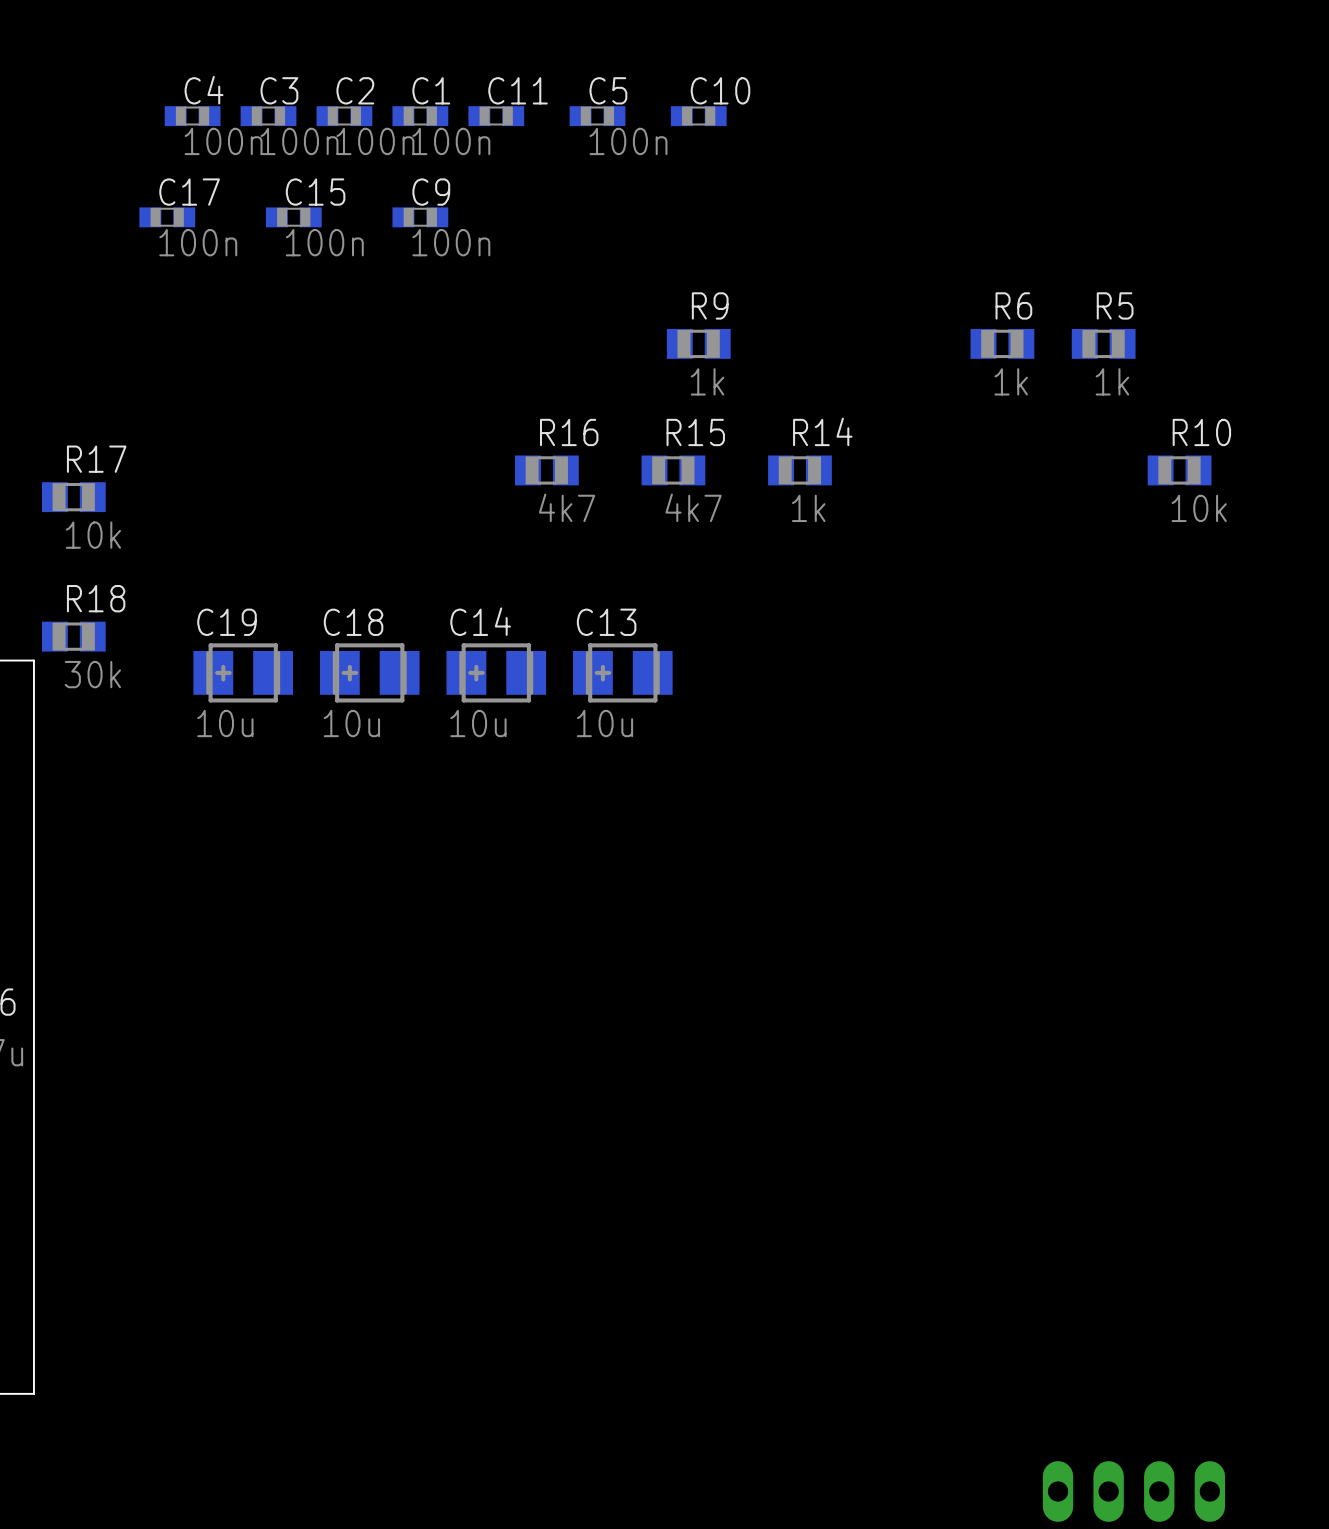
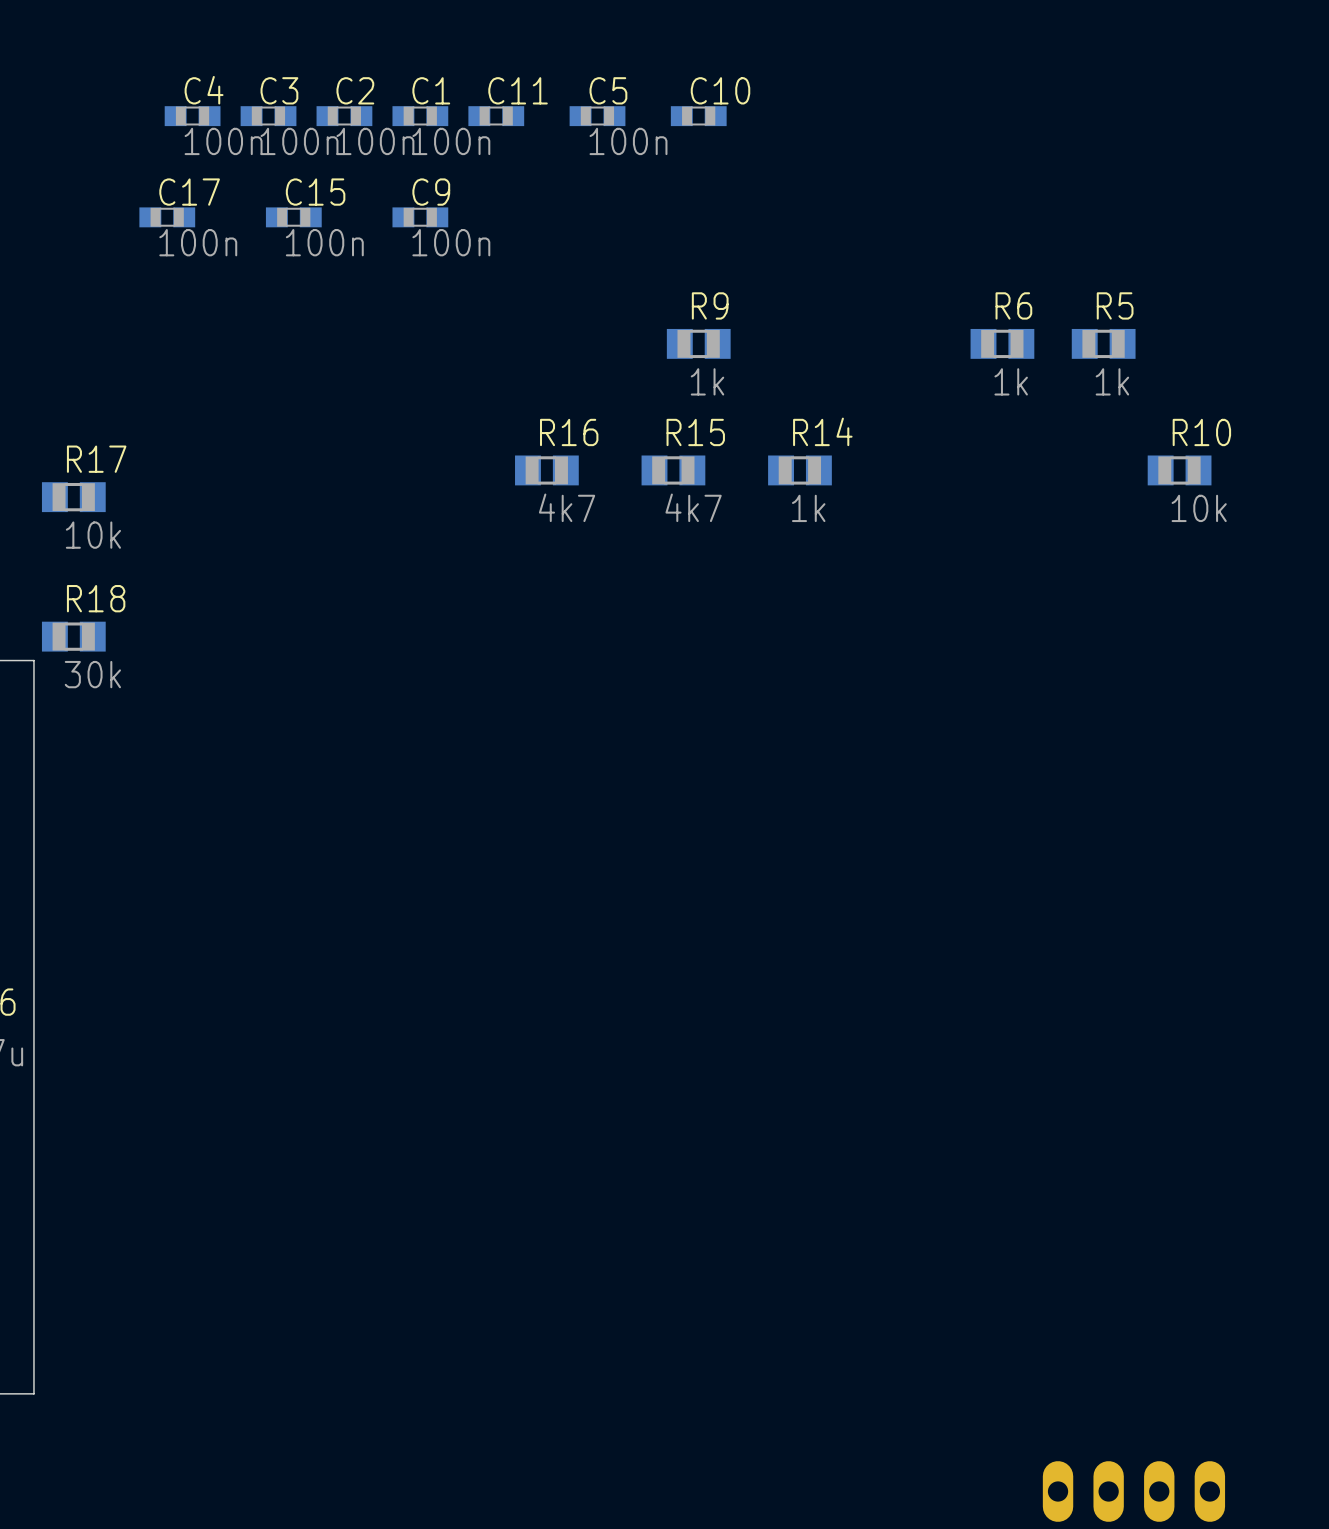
C19: 10u (243, 672) -> none
C18: 10u (369, 672) -> none
C14: 10u (496, 672) -> none
C13: 10u (622, 672) -> none

